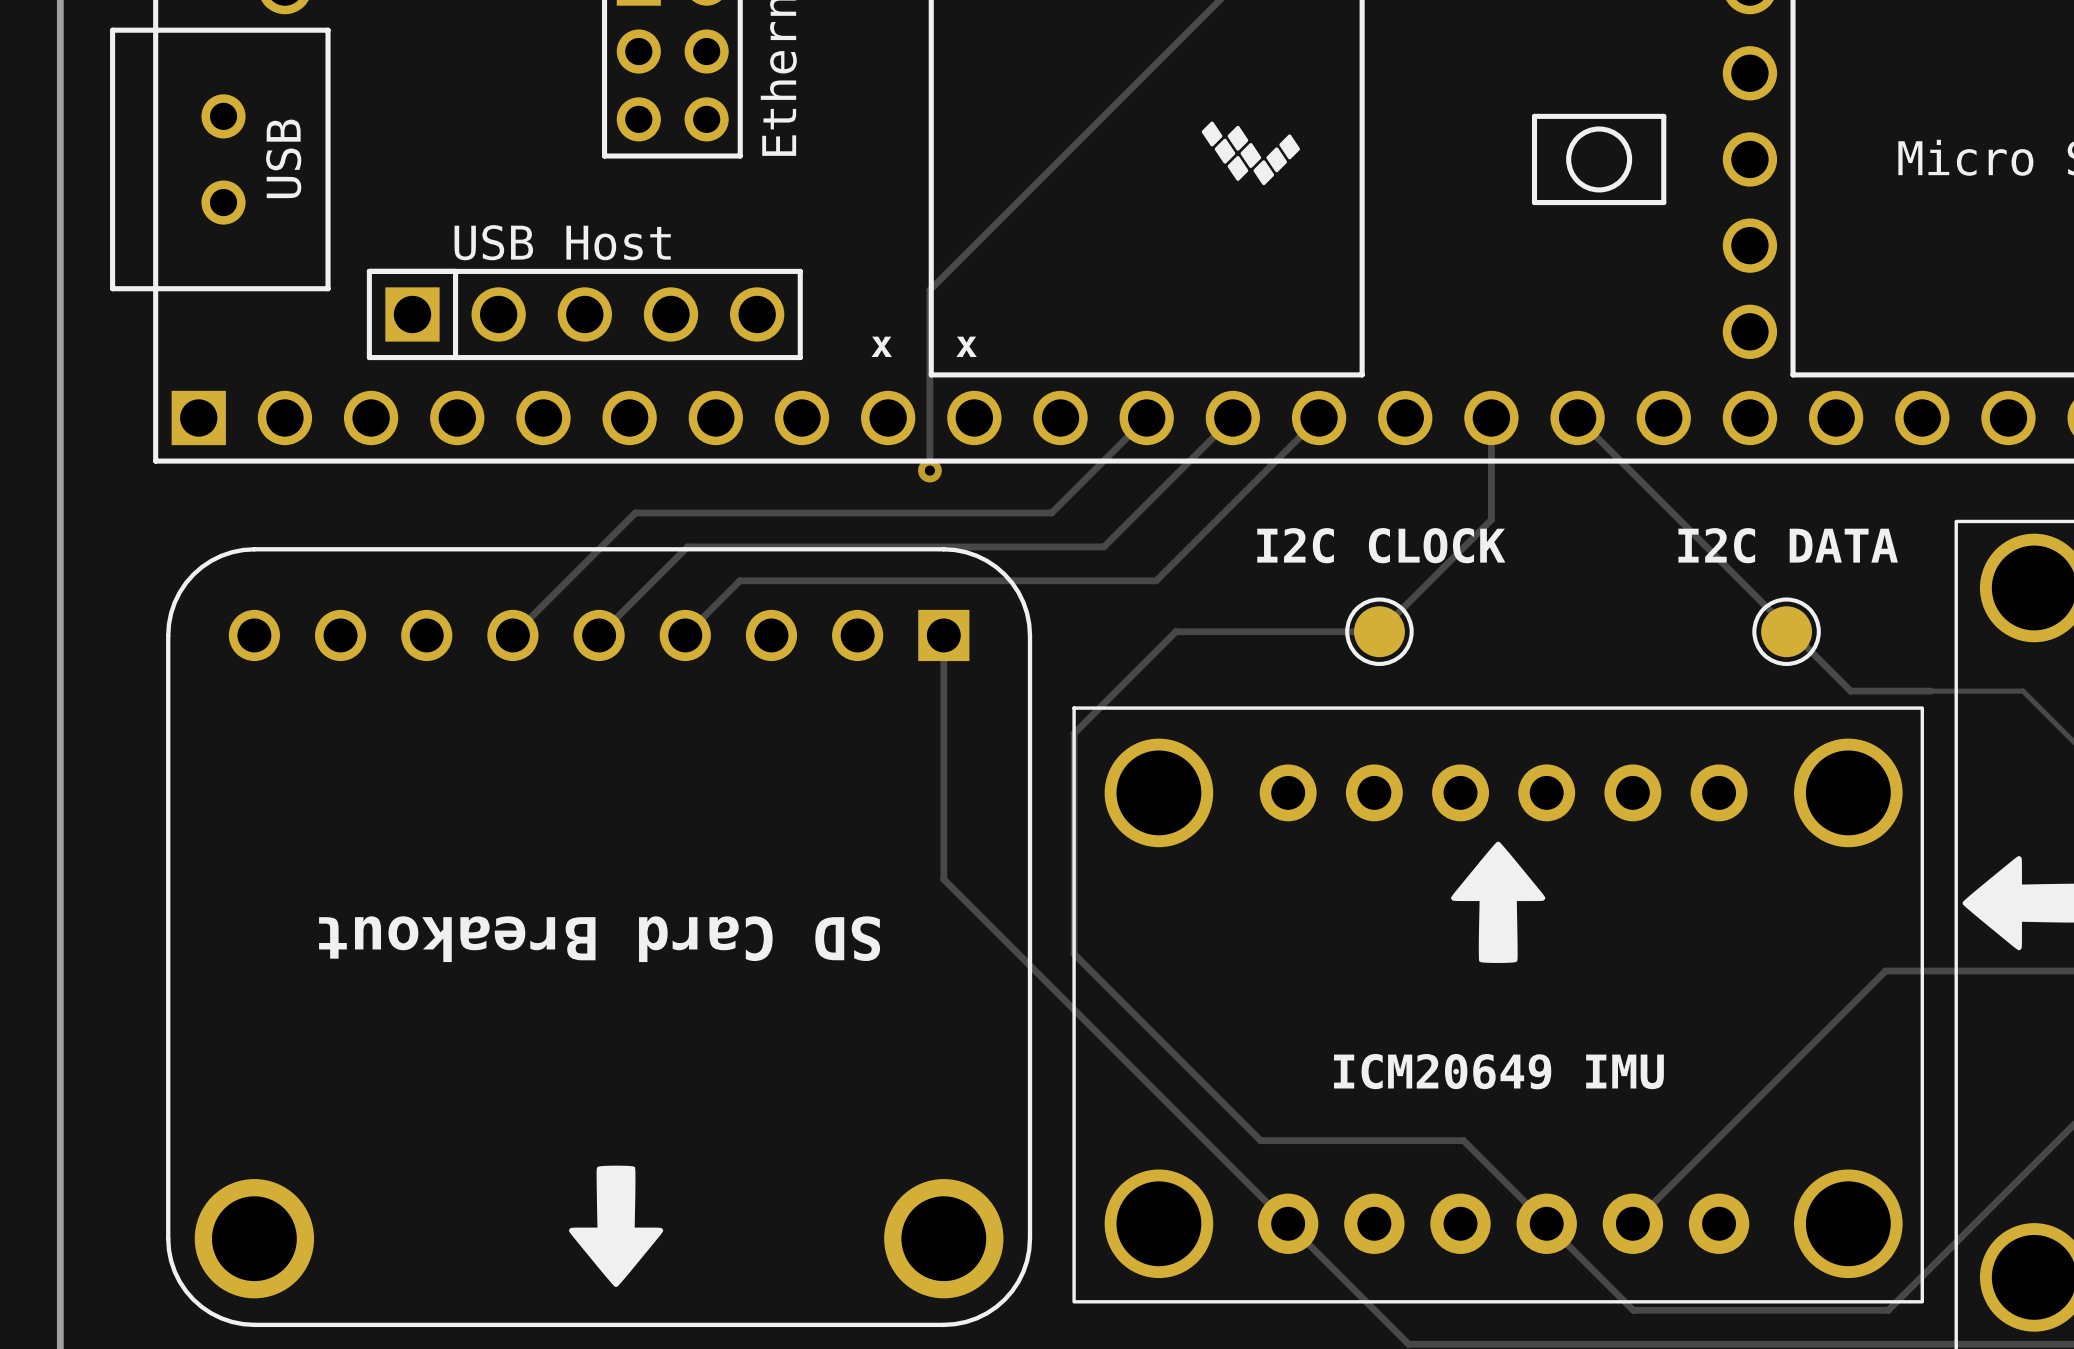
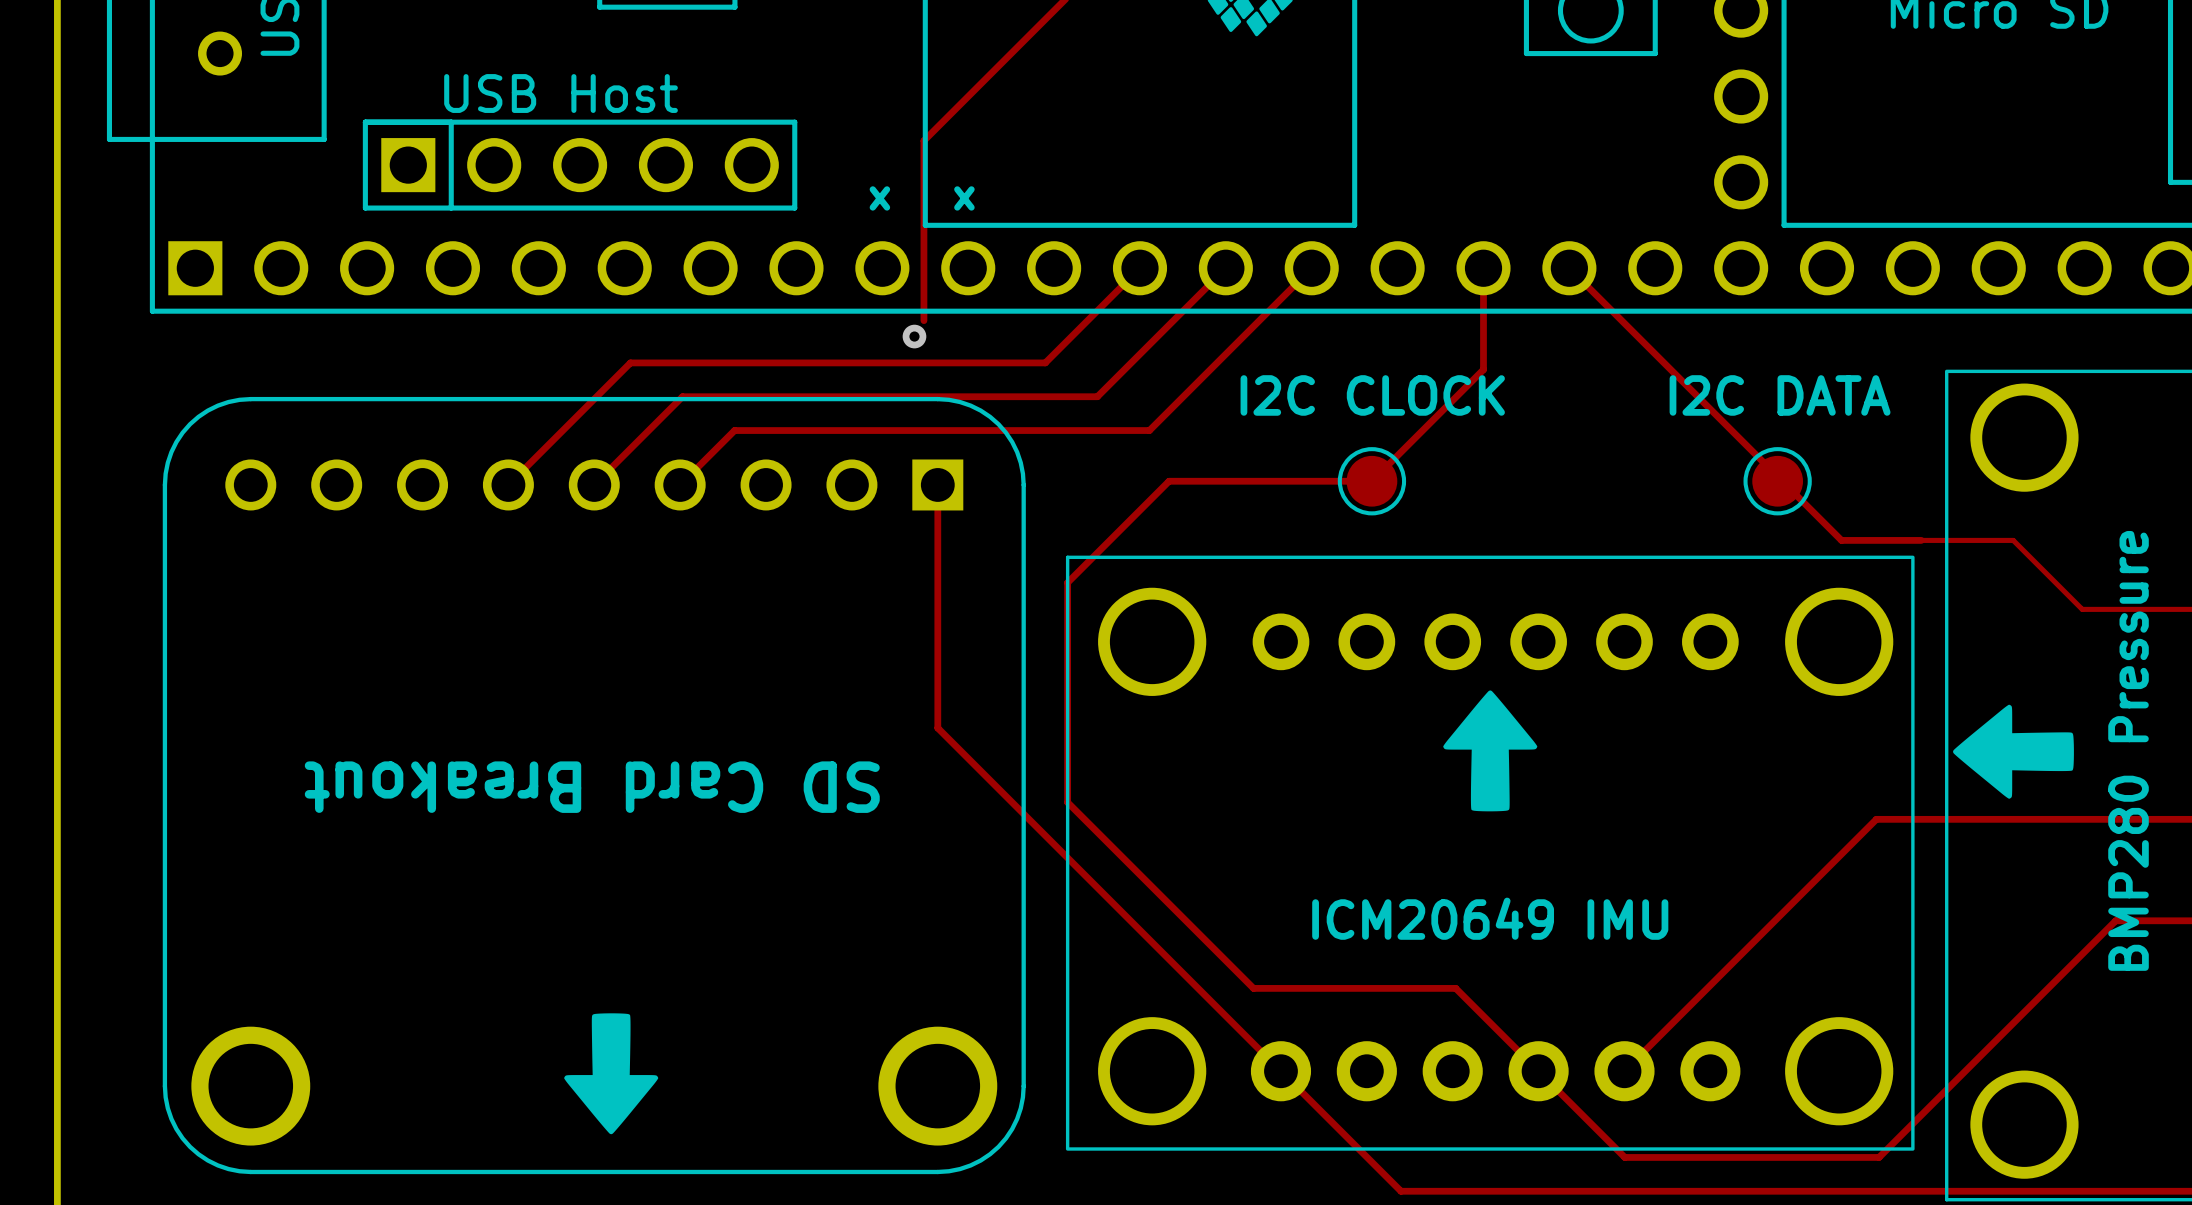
via position: (929, 470) -> (914, 336)

